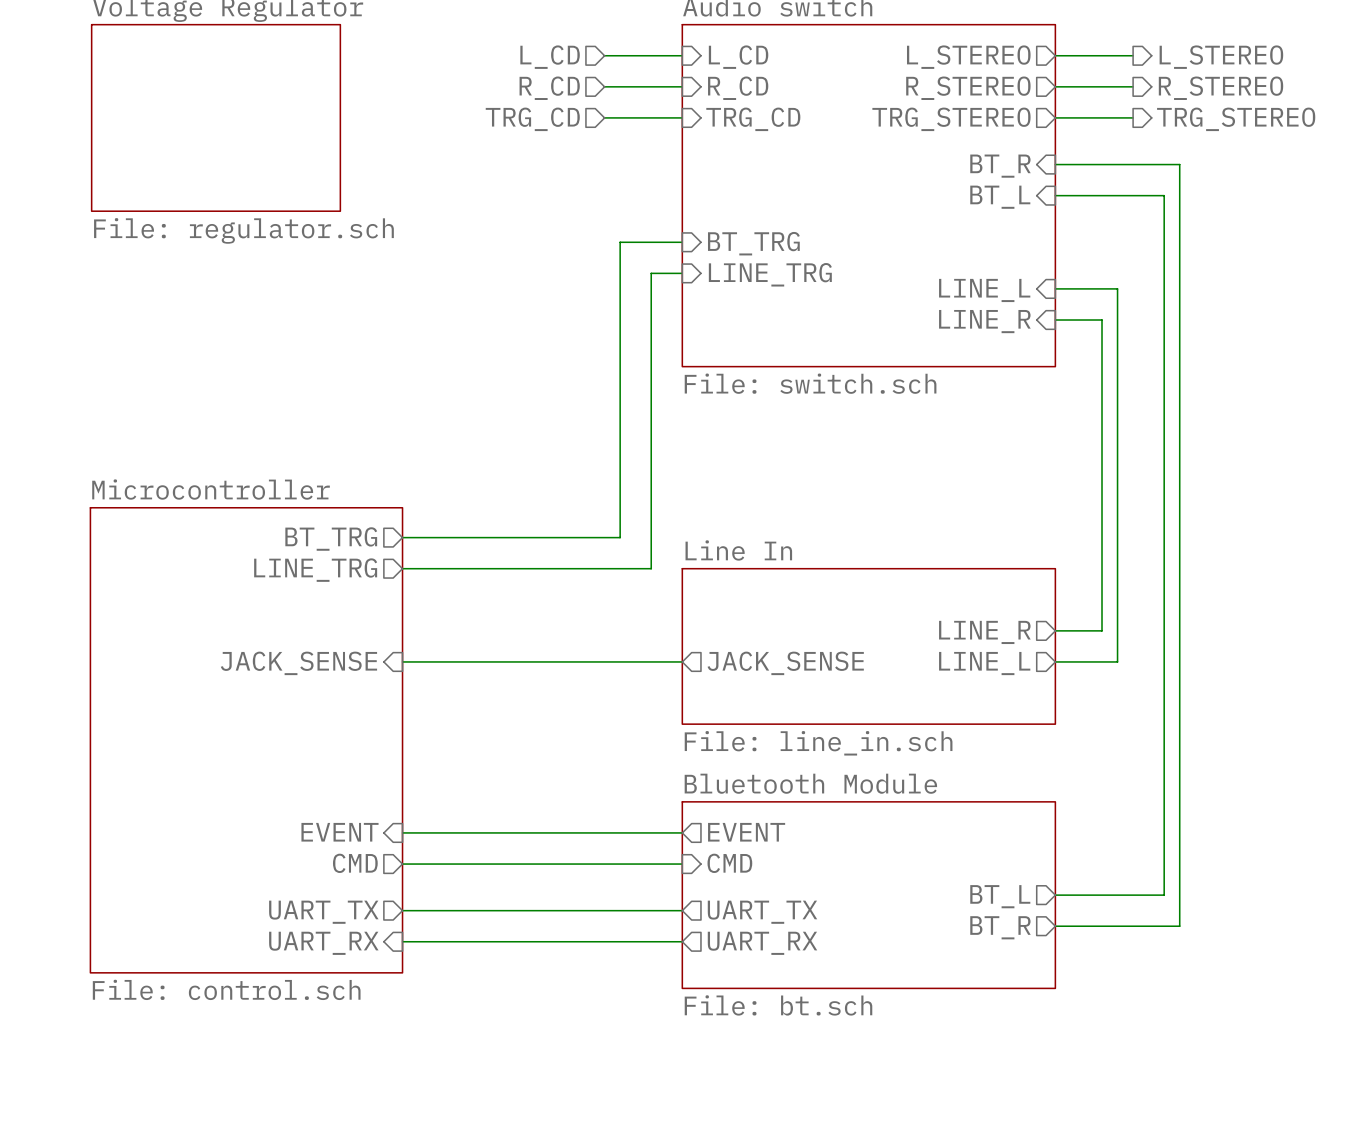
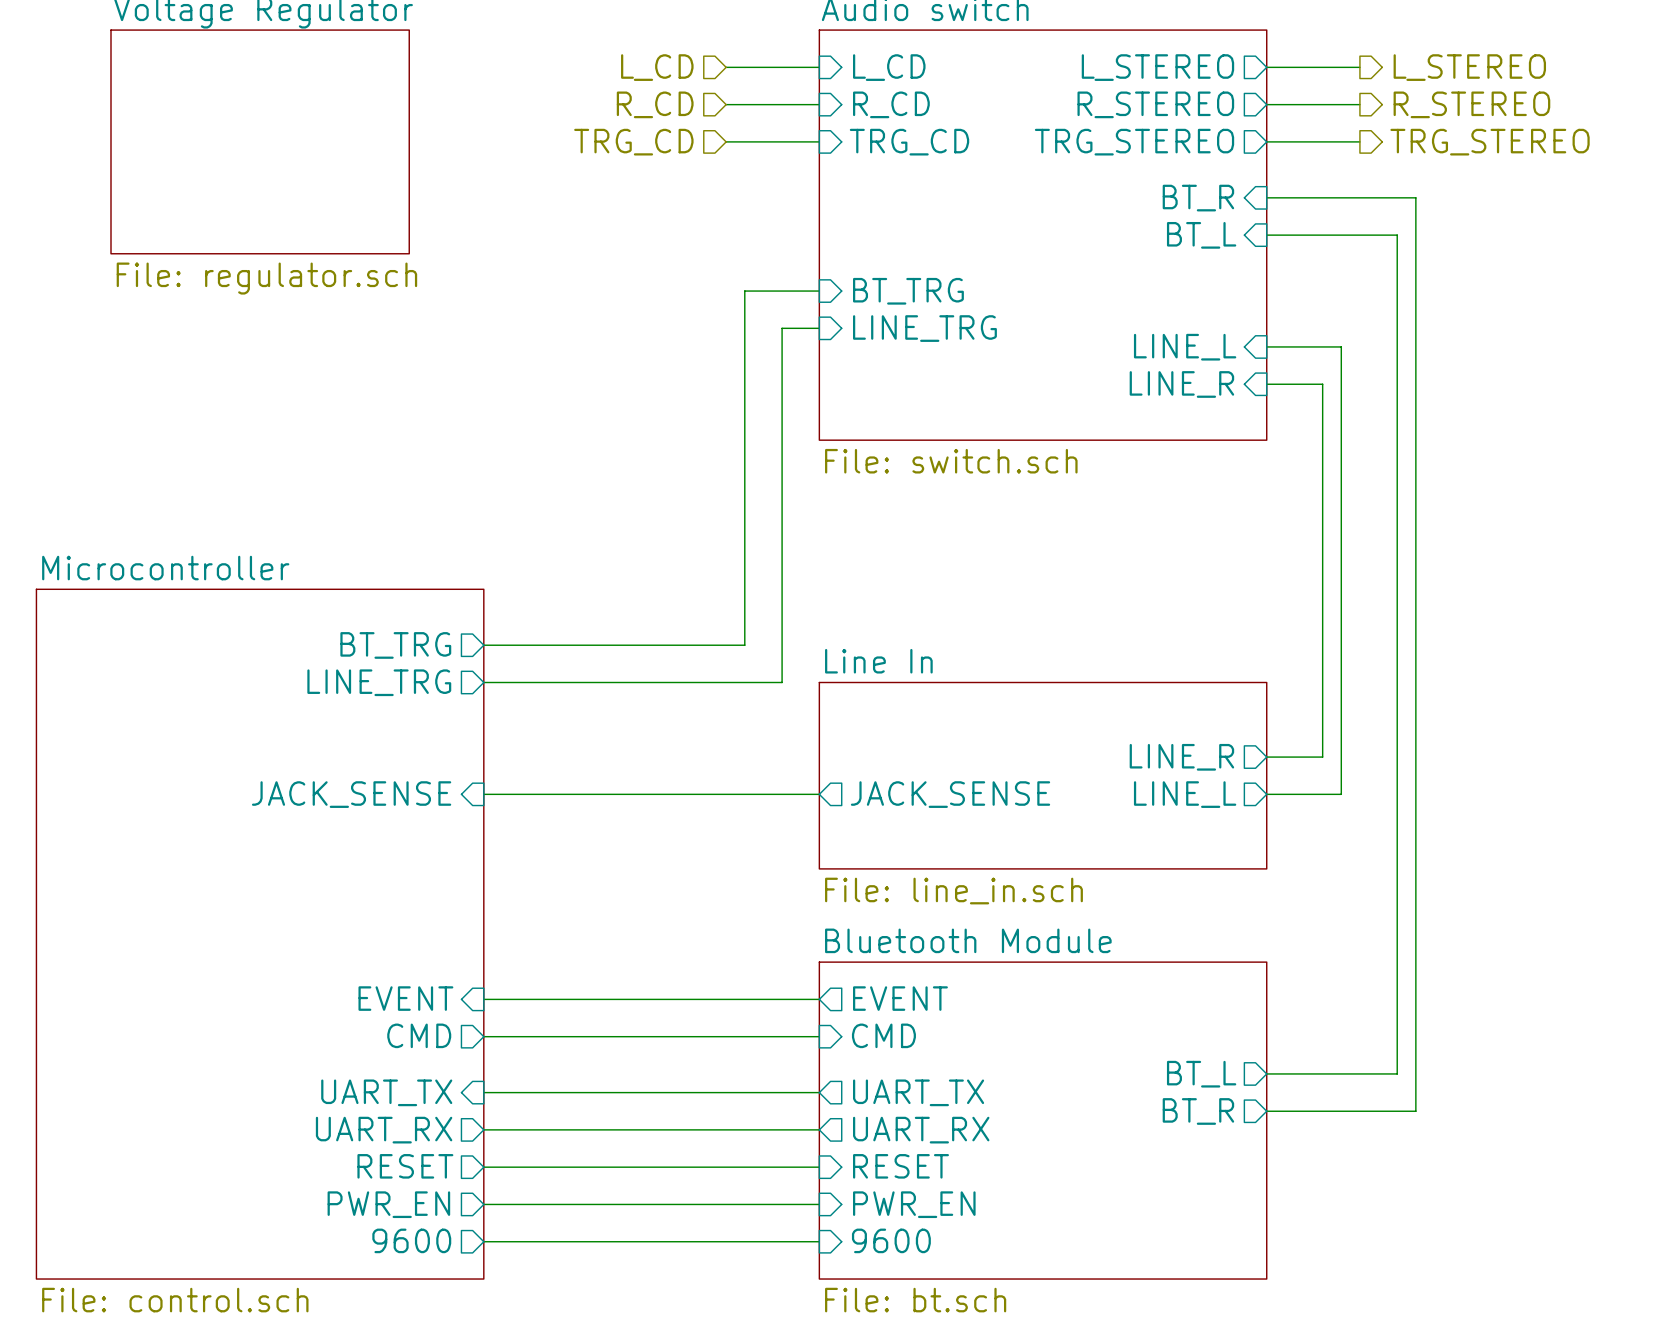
sheet Microcontroller: File: control.sch (246, 740) -> none
sheet Microcontroller: none -> File: control.sch (260, 934)
sheet Bluetooth Module: File: bt.sch (868, 895) -> none
sheet pin shape: output (323, 912) -> input (386, 1092)
sheet Bluetooth Module: none -> File: bt.sch (1043, 1120)
sheet pin shape: input (323, 943) -> output (384, 1130)
sheet pin: none -> RESET (405, 1166)
wire: none -> (483, 1167) (819, 1167)
sheet pin: none -> RESET (900, 1166)
wire: none -> (483, 1204) (819, 1204)
sheet pin: none -> PWR_EN (388, 1204)
sheet pin: none -> PWR_EN (914, 1204)
sheet pin: none -> 9600 (411, 1240)
sheet pin: none -> 9600 (891, 1240)
wire: none -> (483, 1241) (819, 1241)

